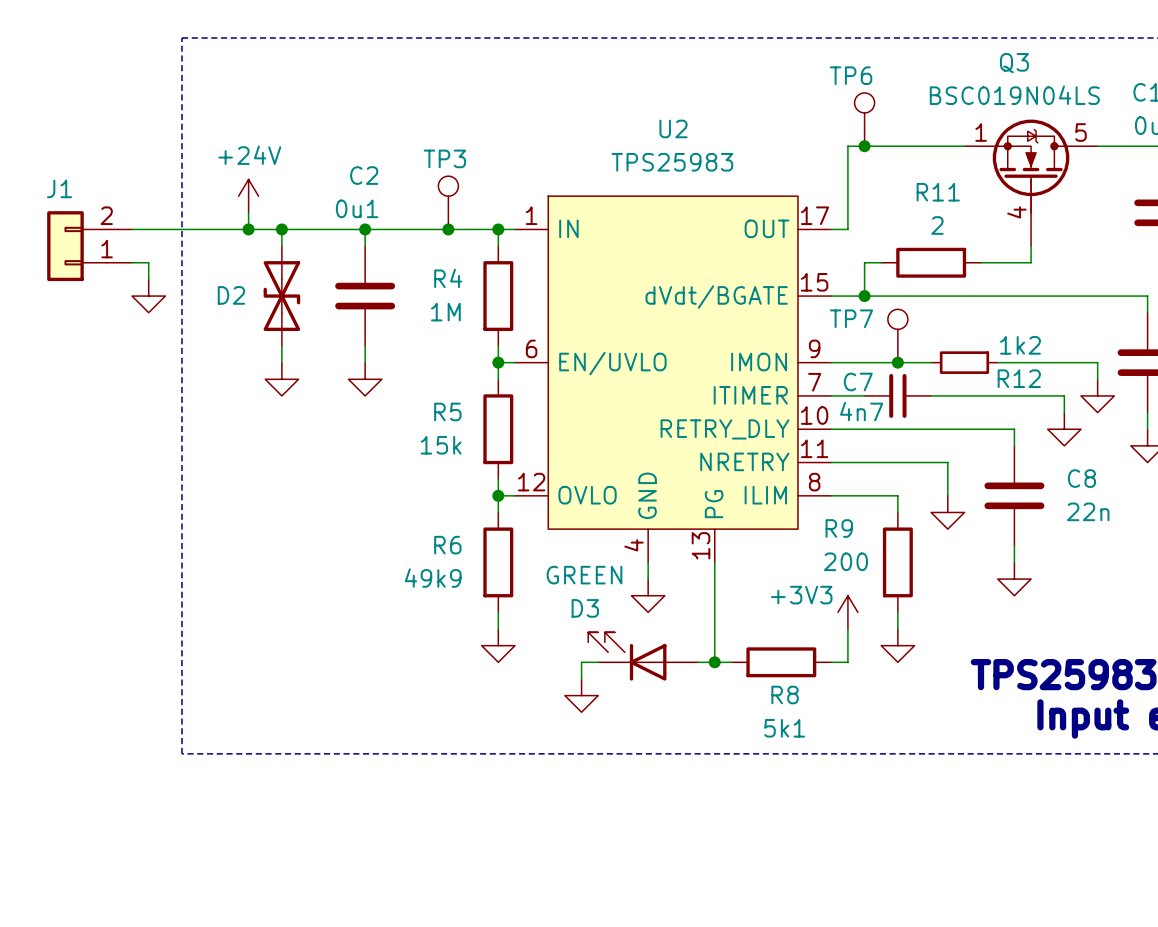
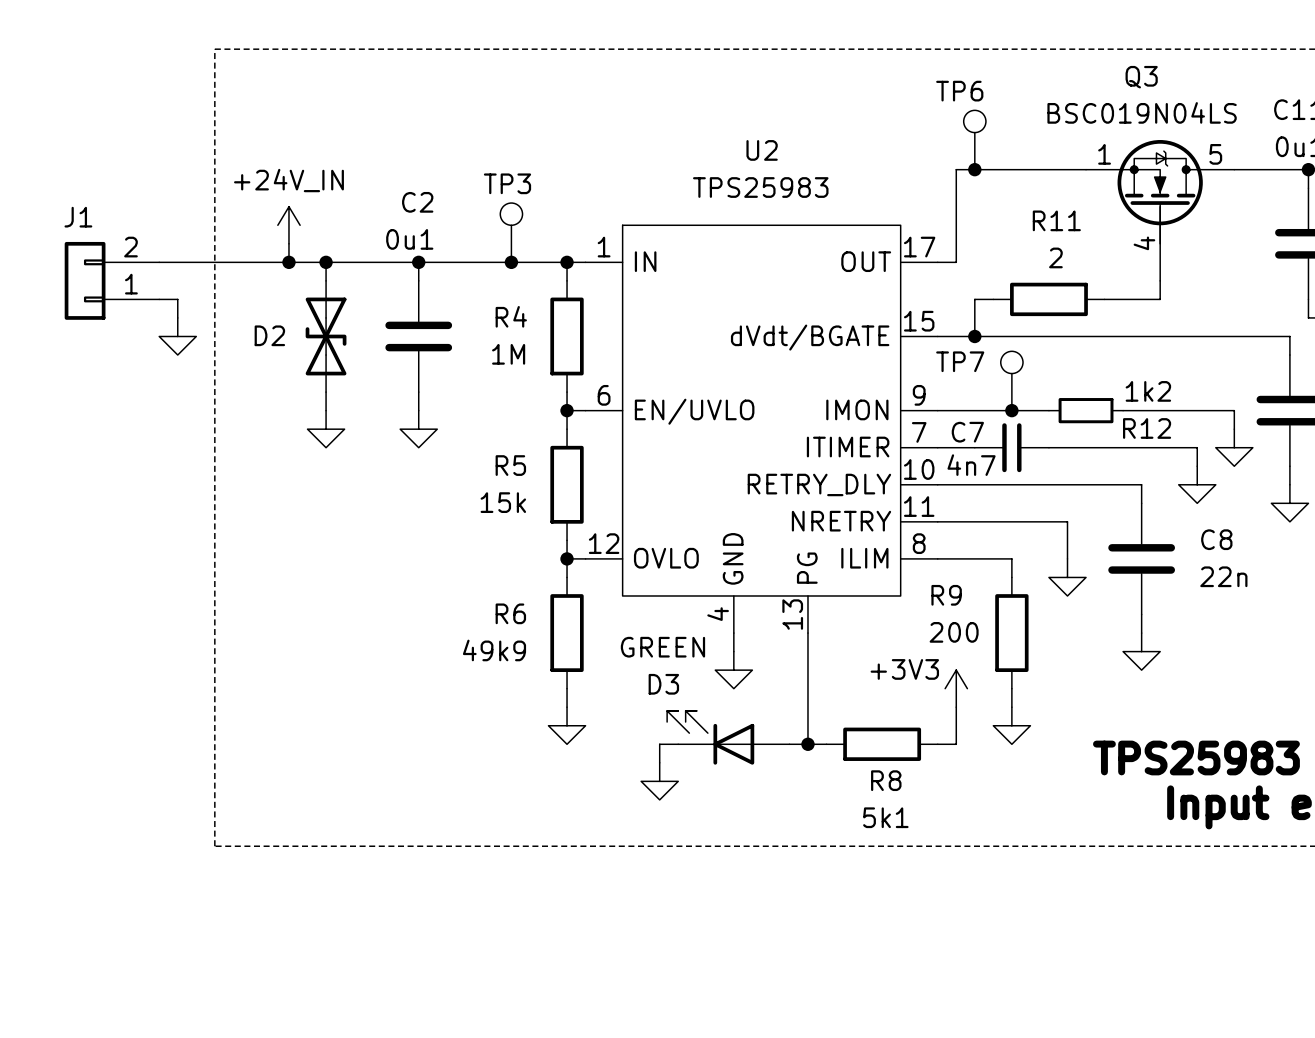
power symbol: +24V (248, 196) -> +24V_IN (288, 225)

